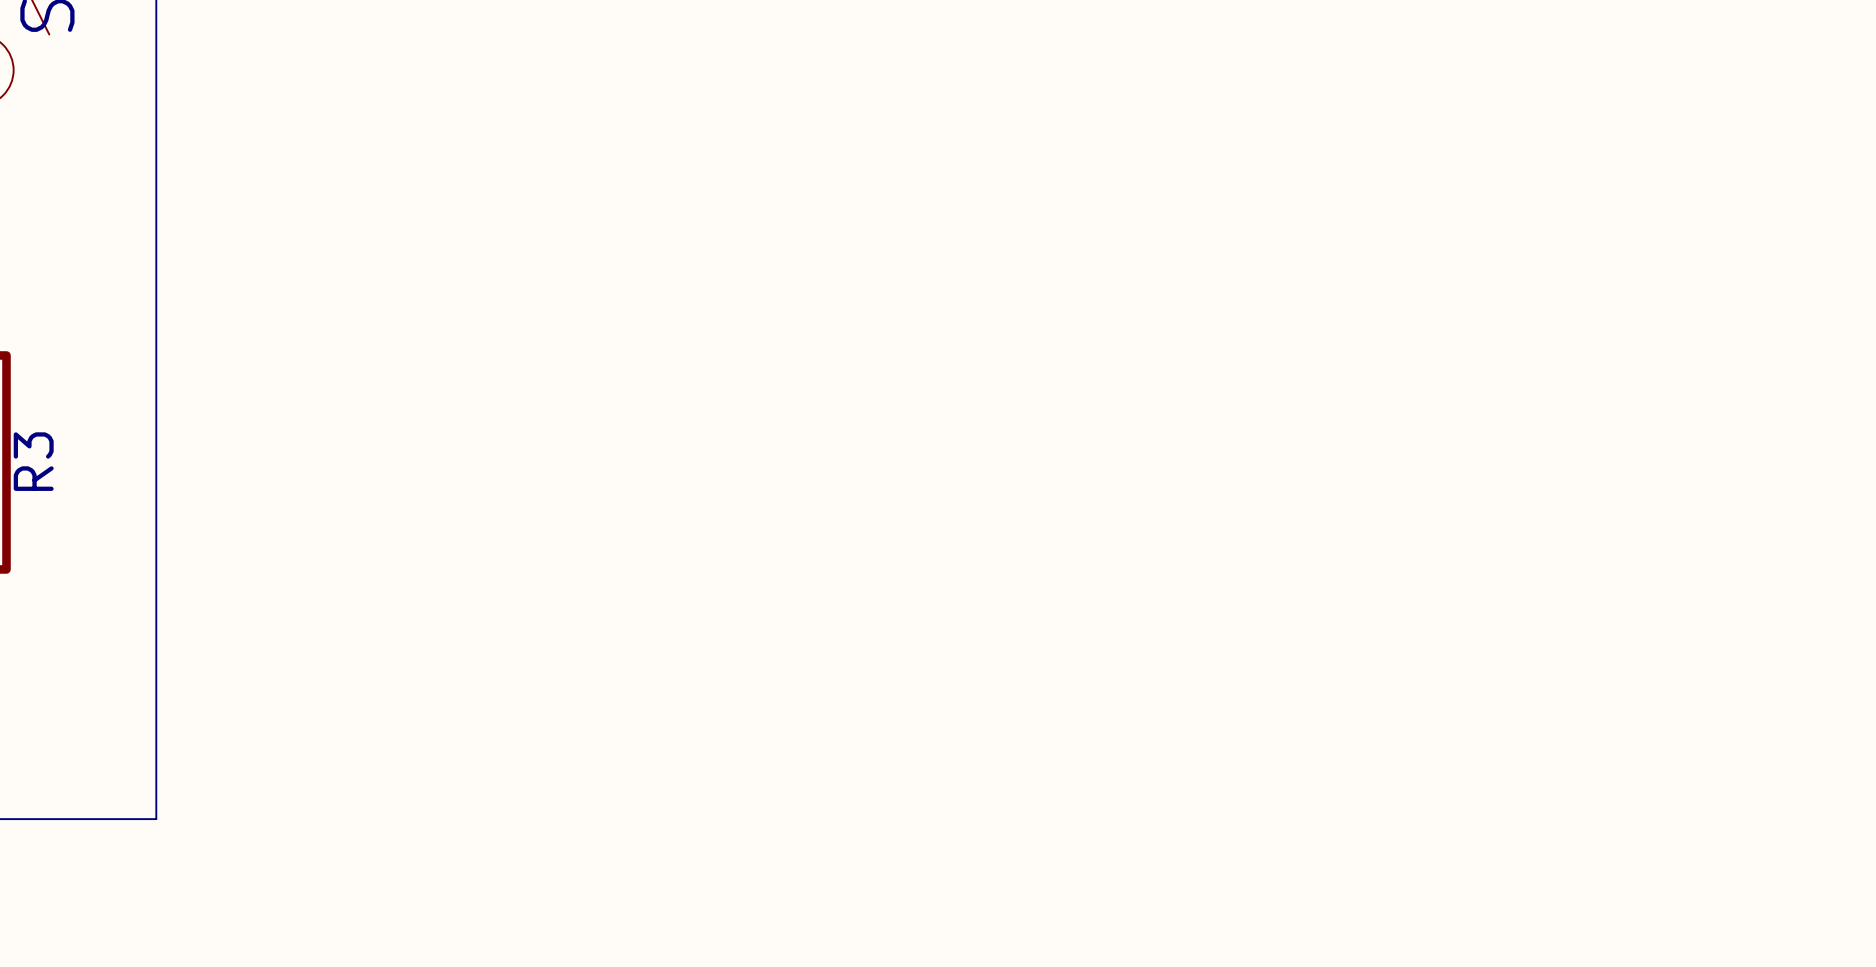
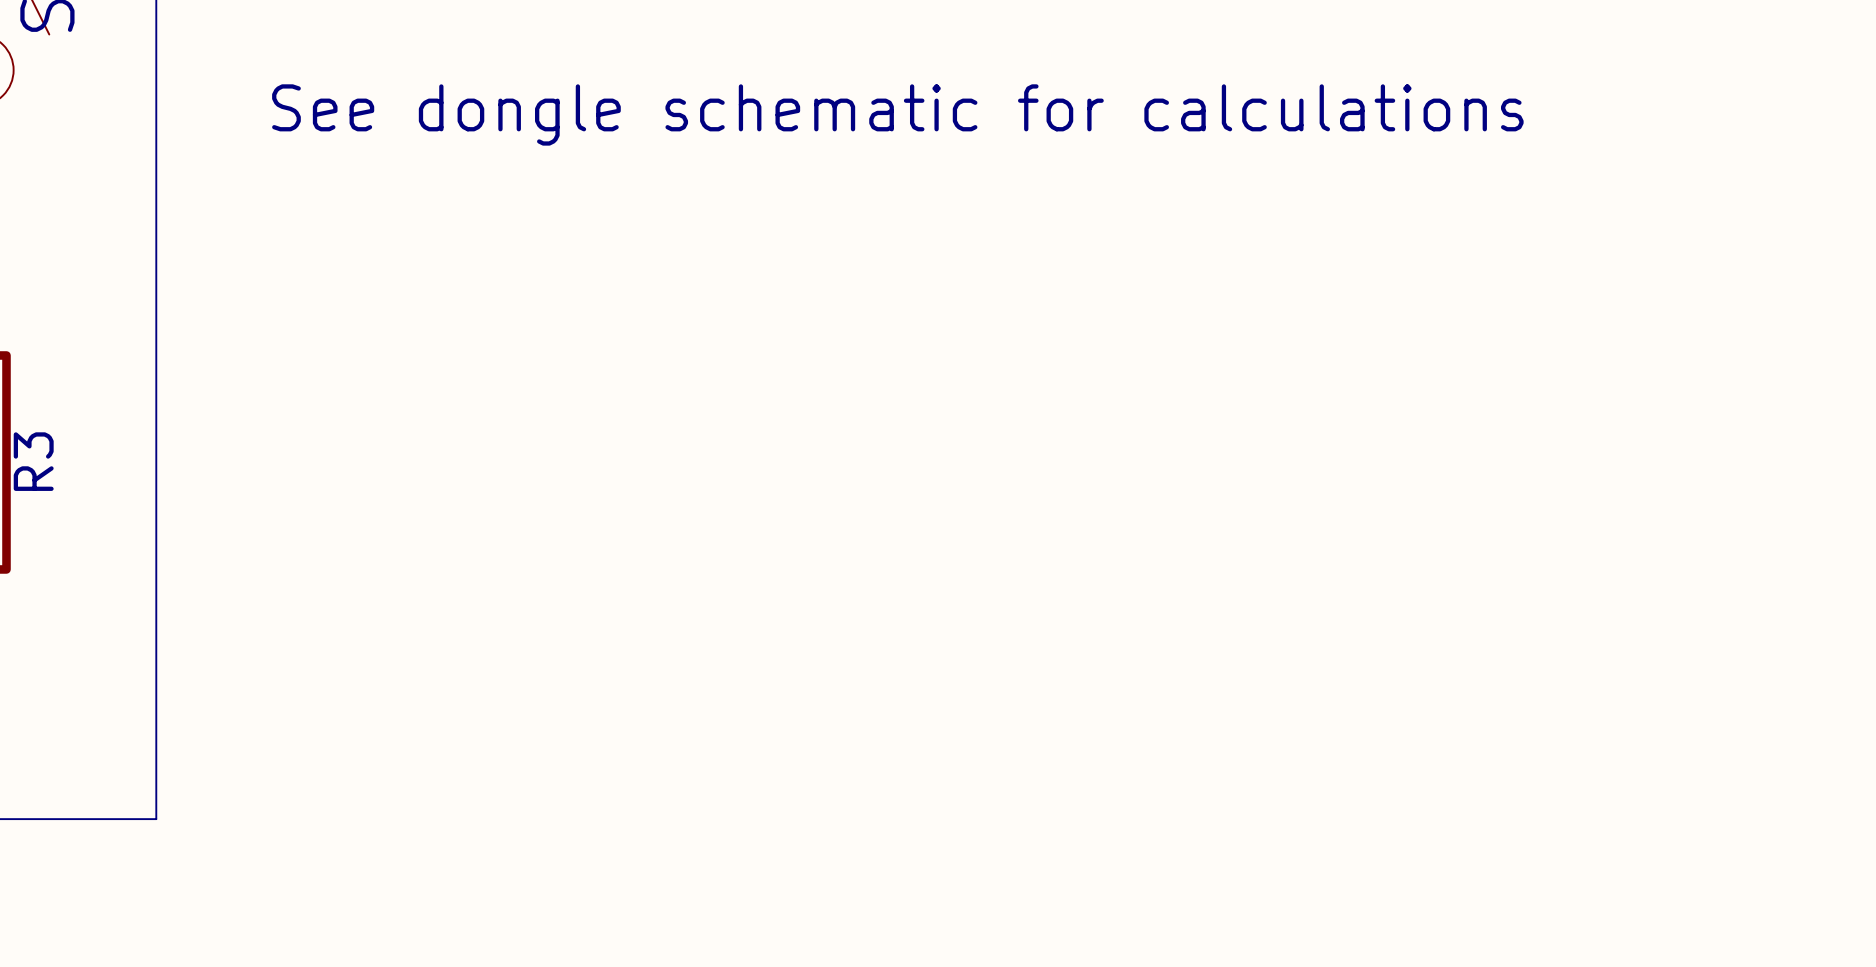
text: none -> See dongle schematic for calculations (897, 114)

